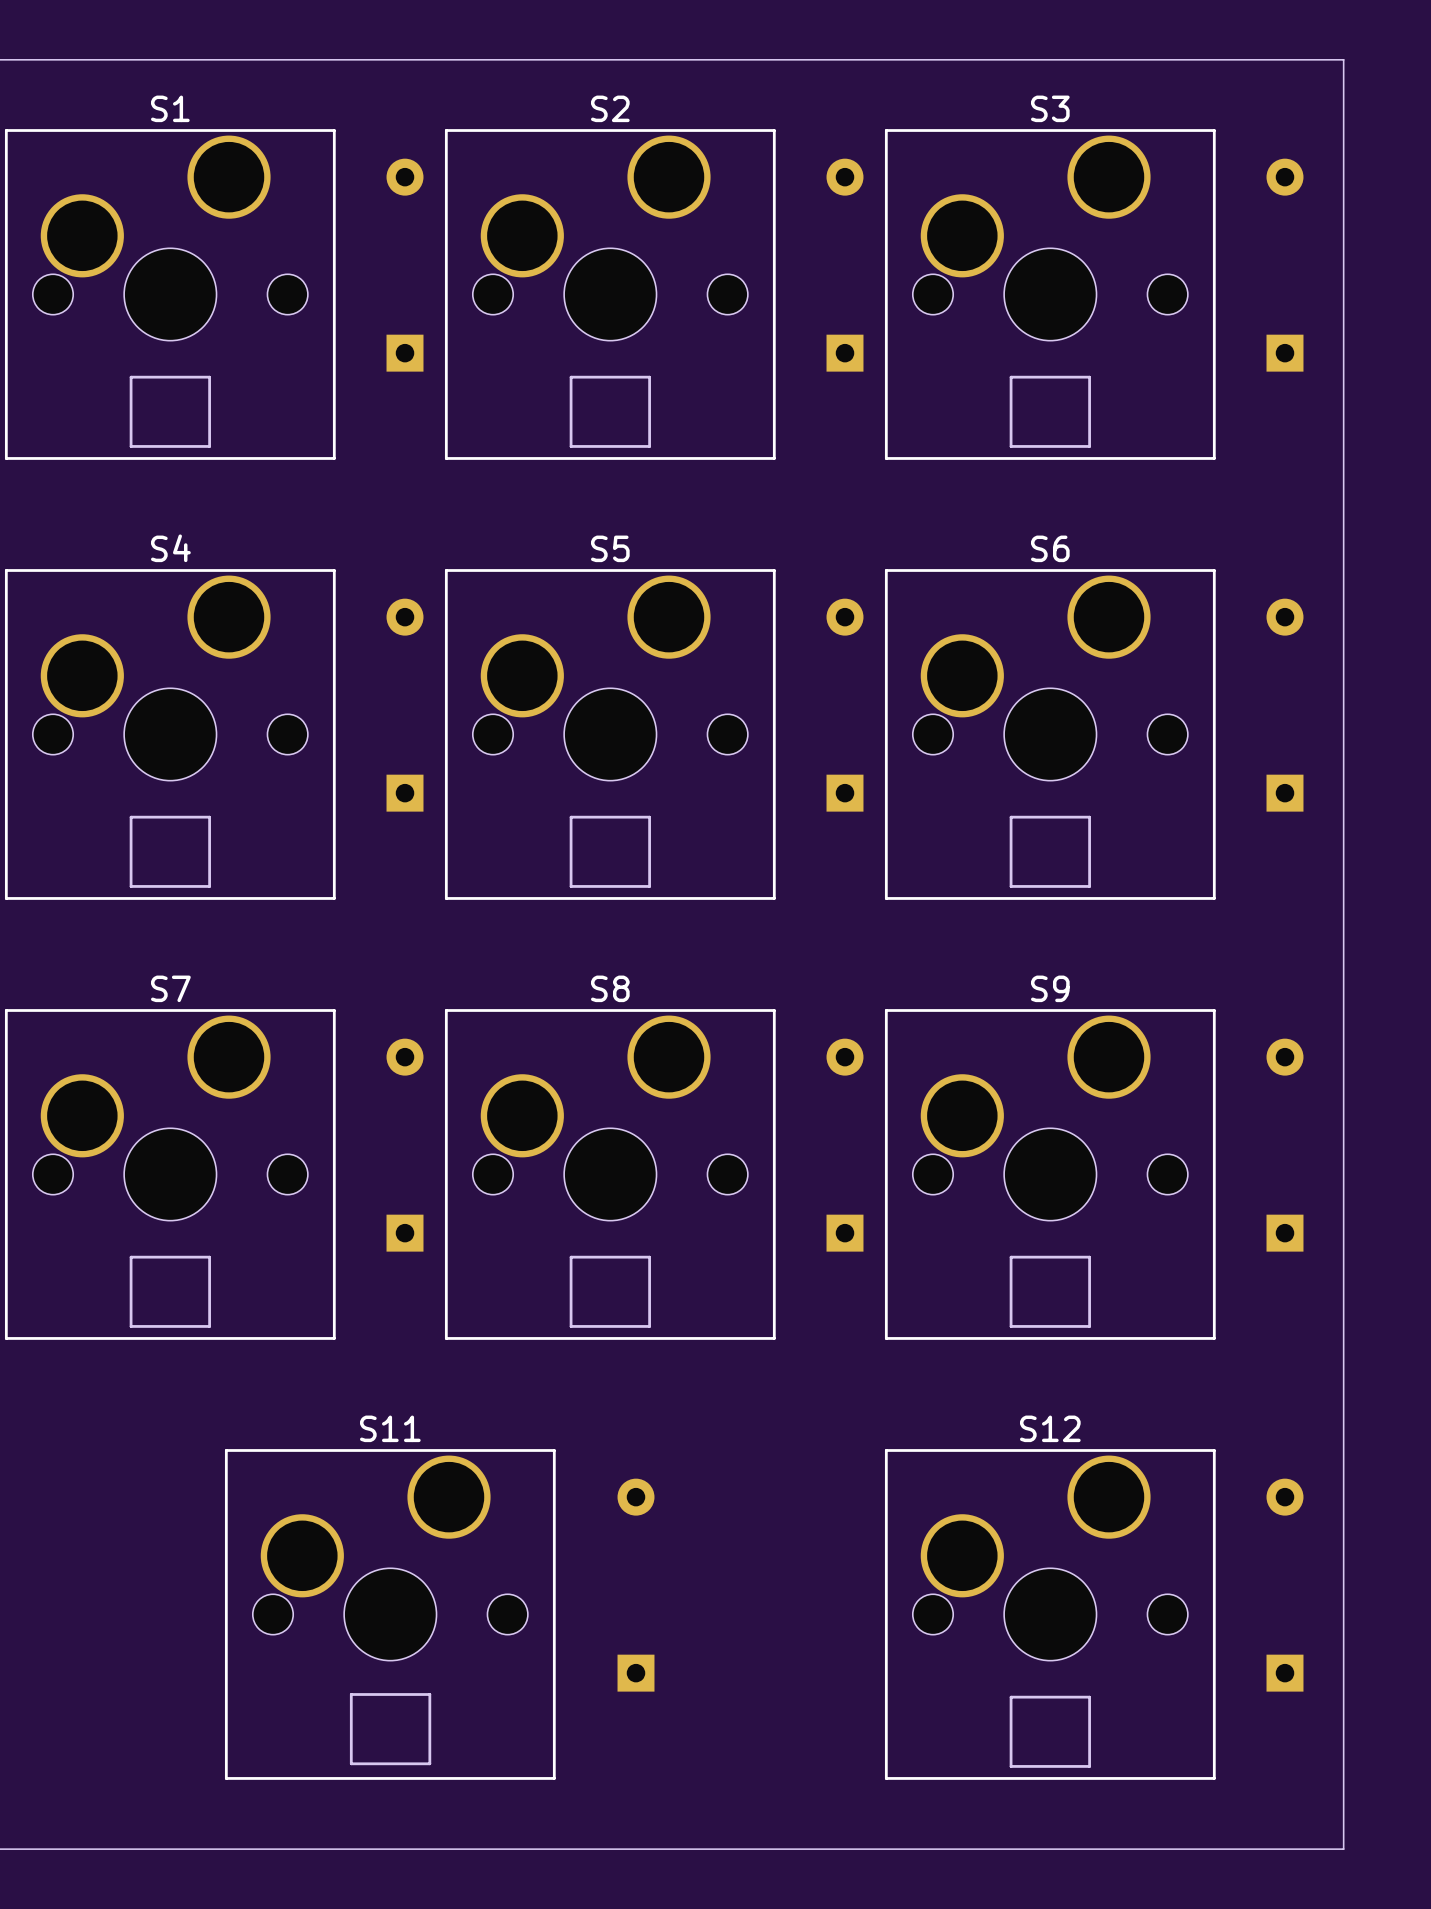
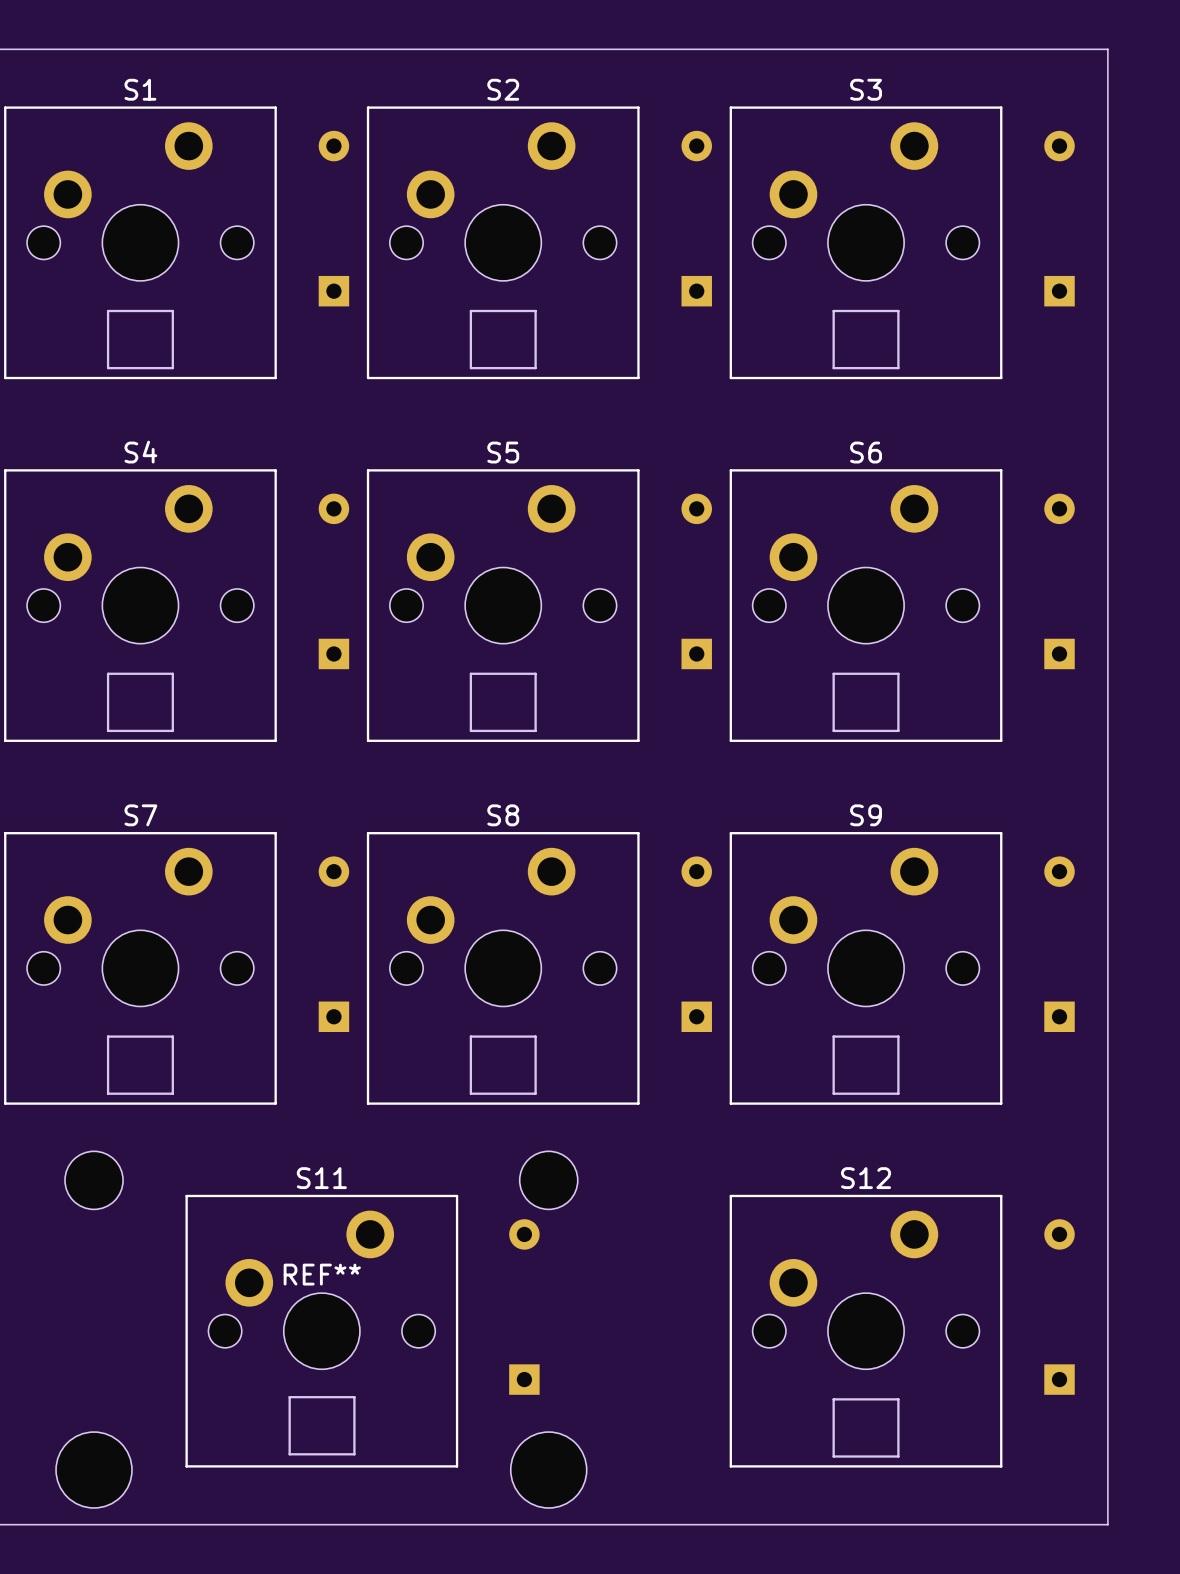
S1 footprint: [4, 129, 336, 460] -> [4, 106, 277, 380]
S2 footprint: [444, 129, 776, 460] -> [366, 106, 640, 380]
S3 footprint: [884, 129, 1216, 460] -> [729, 106, 1003, 380]
S4 footprint: [4, 569, 336, 900] -> [4, 469, 277, 742]
S5 footprint: [444, 569, 776, 900] -> [366, 469, 640, 742]
S6 footprint: [884, 569, 1216, 900] -> [729, 469, 1003, 742]
S7 footprint: [4, 1009, 336, 1340] -> [4, 832, 277, 1105]
S8 footprint: [444, 1009, 776, 1340] -> [366, 832, 640, 1105]
S9 footprint: [884, 1009, 1216, 1340] -> [729, 832, 1003, 1105]
S11 footprint: [224, 1449, 556, 1780] -> [185, 1194, 459, 1468]
S12 footprint: [884, 1449, 1216, 1780] -> [729, 1194, 1003, 1468]
REF**: none -> (321, 1329)

